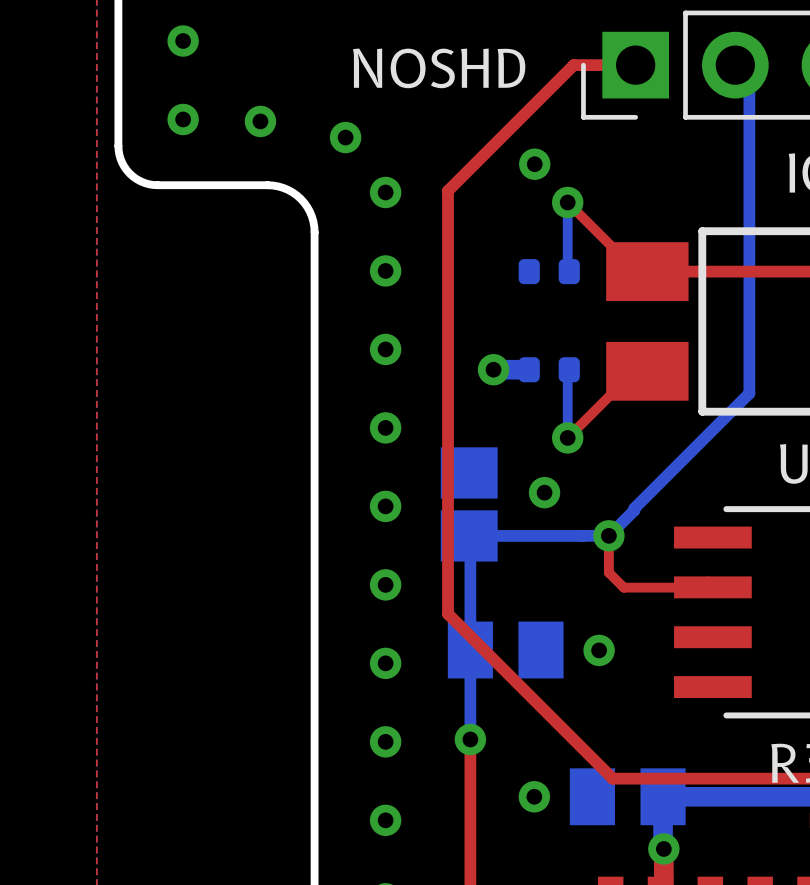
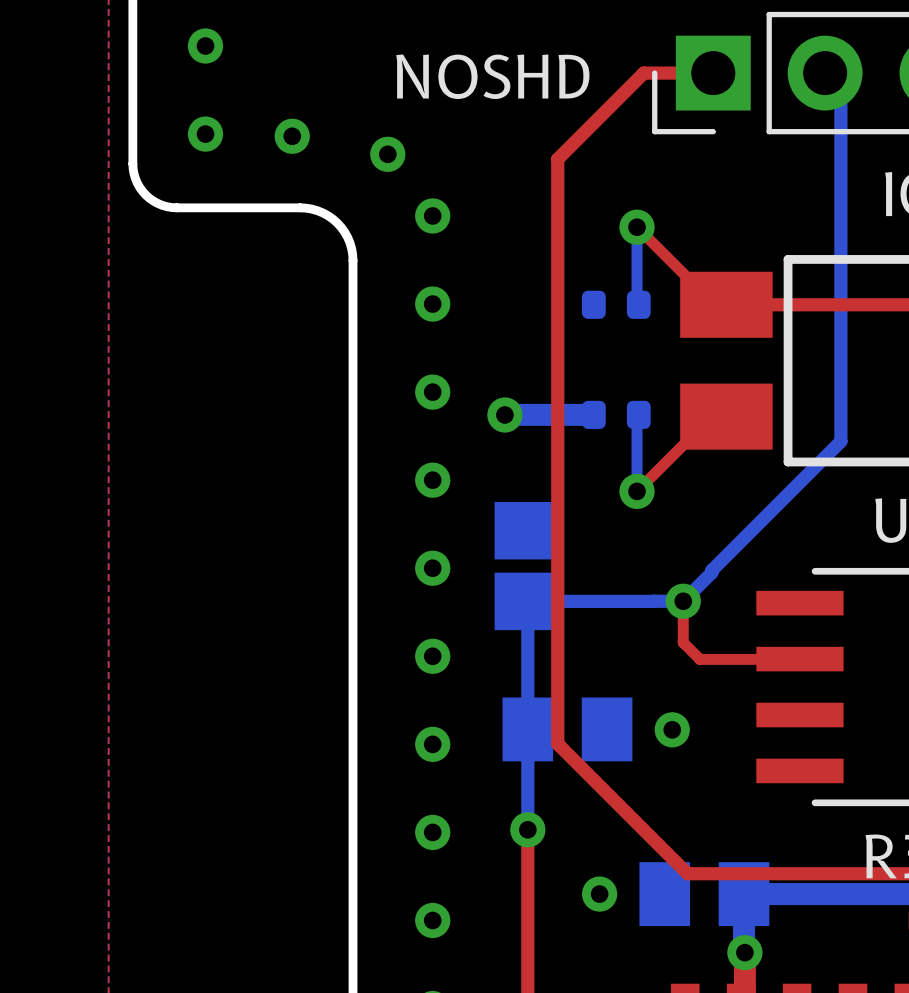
top track: (497, 141) (448, 190) (448, 613) (497, 662) -> (557, 159) (557, 743)
via: (534, 164) -> none
via: none -> (504, 415)
bottom track: none -> (510, 414) (553, 414)
via: (493, 369) -> none
via: (544, 492) -> none

